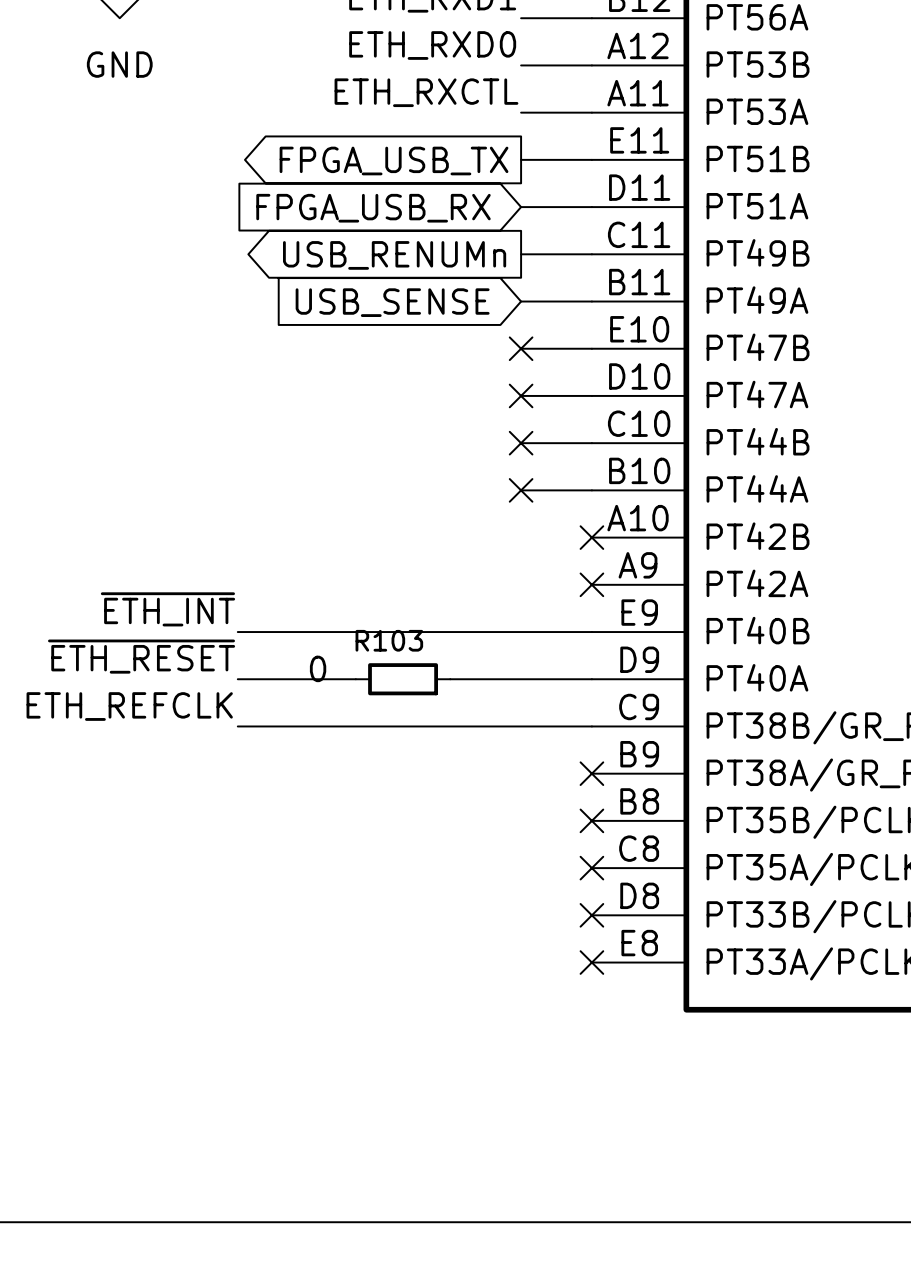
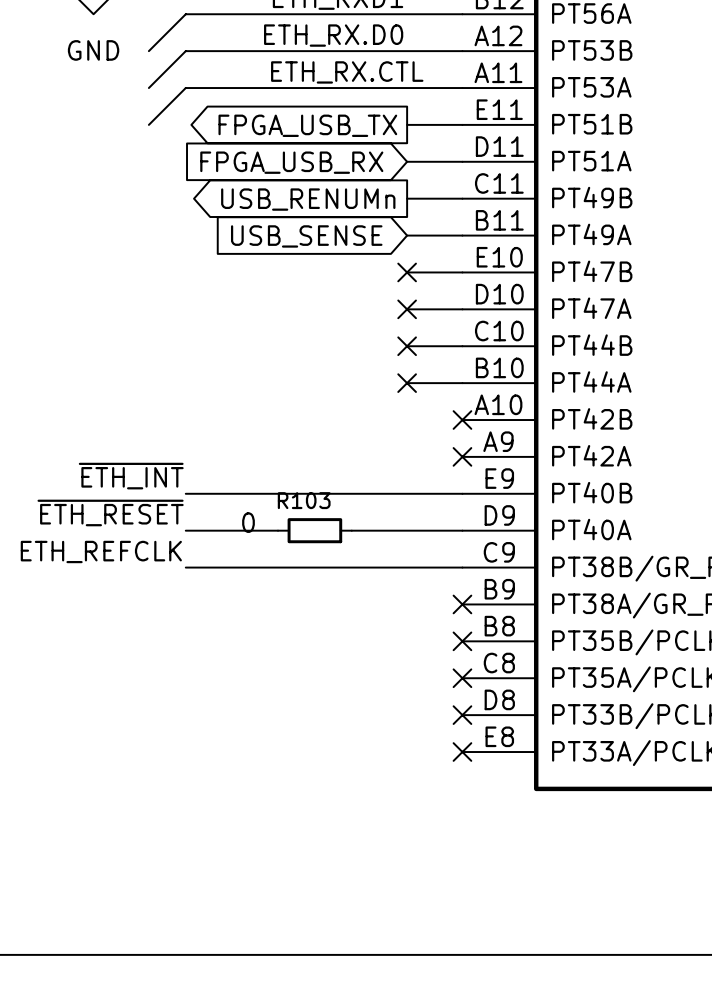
wire: none -> (407, 14) (185, 14) (148, 51)
label: ETH_RXD0 (432, 45) -> ETH_RX.D0 (333, 35)
wire: none -> (407, 51) (185, 51) (148, 88)
label: ETH_RXCTL (426, 92) -> ETH_RX.CTL (347, 72)
wire: none -> (407, 88) (185, 88) (148, 124)

